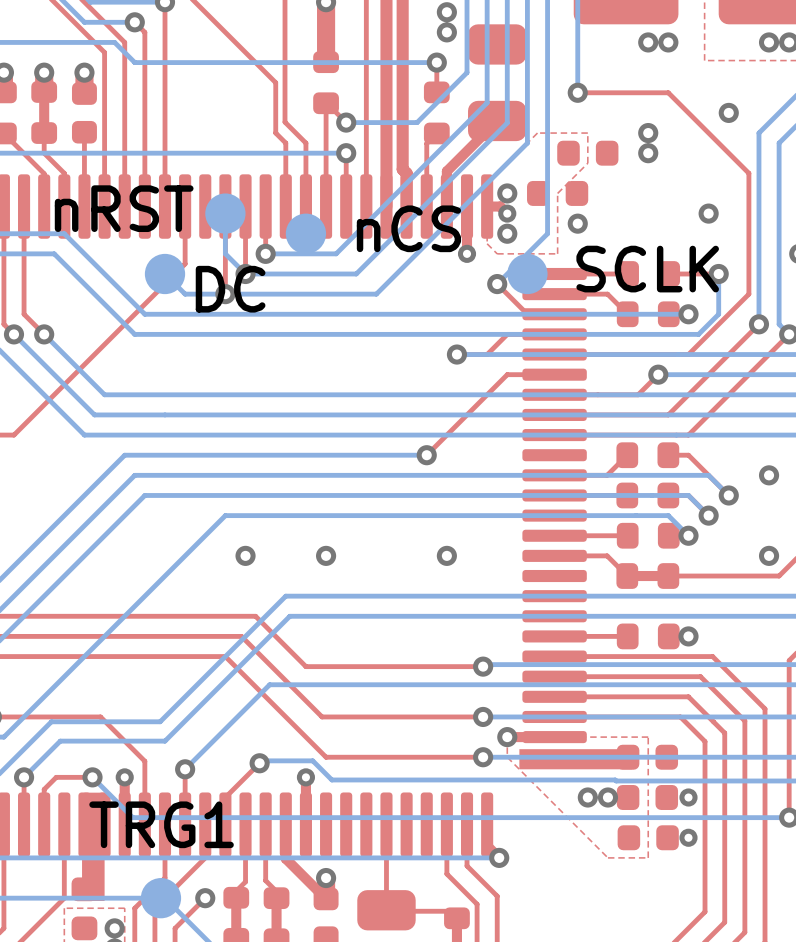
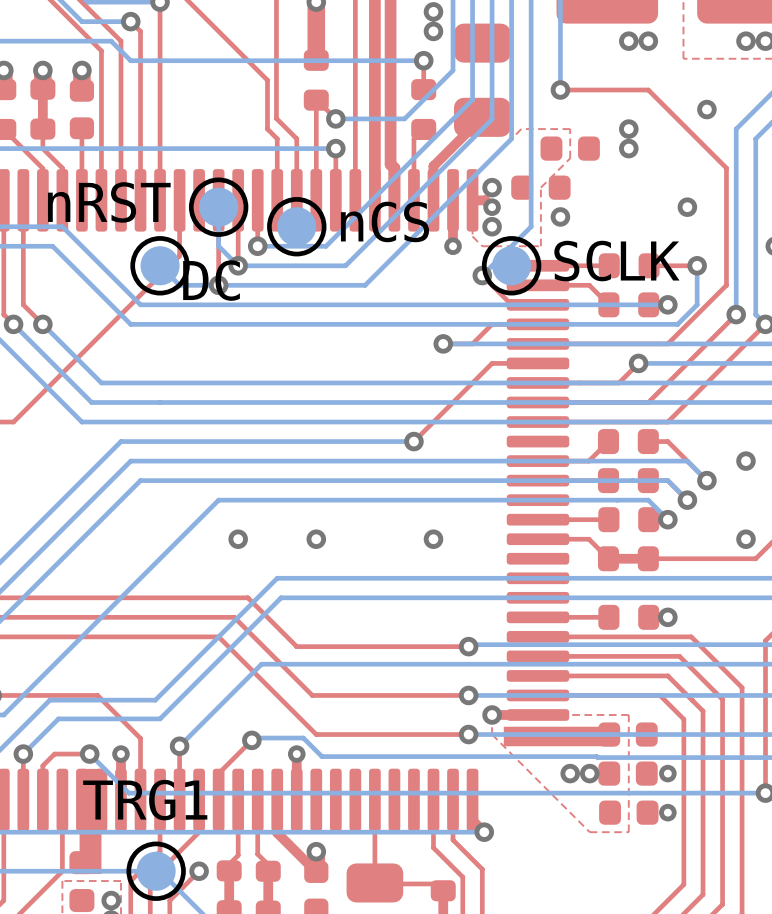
part footprint: [205, 193, 246, 234] -> [188, 177, 249, 237]
part footprint: [285, 213, 327, 254] -> [267, 197, 327, 257]
part footprint: [144, 253, 186, 295] -> [130, 236, 190, 296]
part footprint: [507, 253, 548, 295] -> [481, 236, 542, 296]
part footprint: [140, 878, 182, 919] -> [126, 841, 186, 901]

